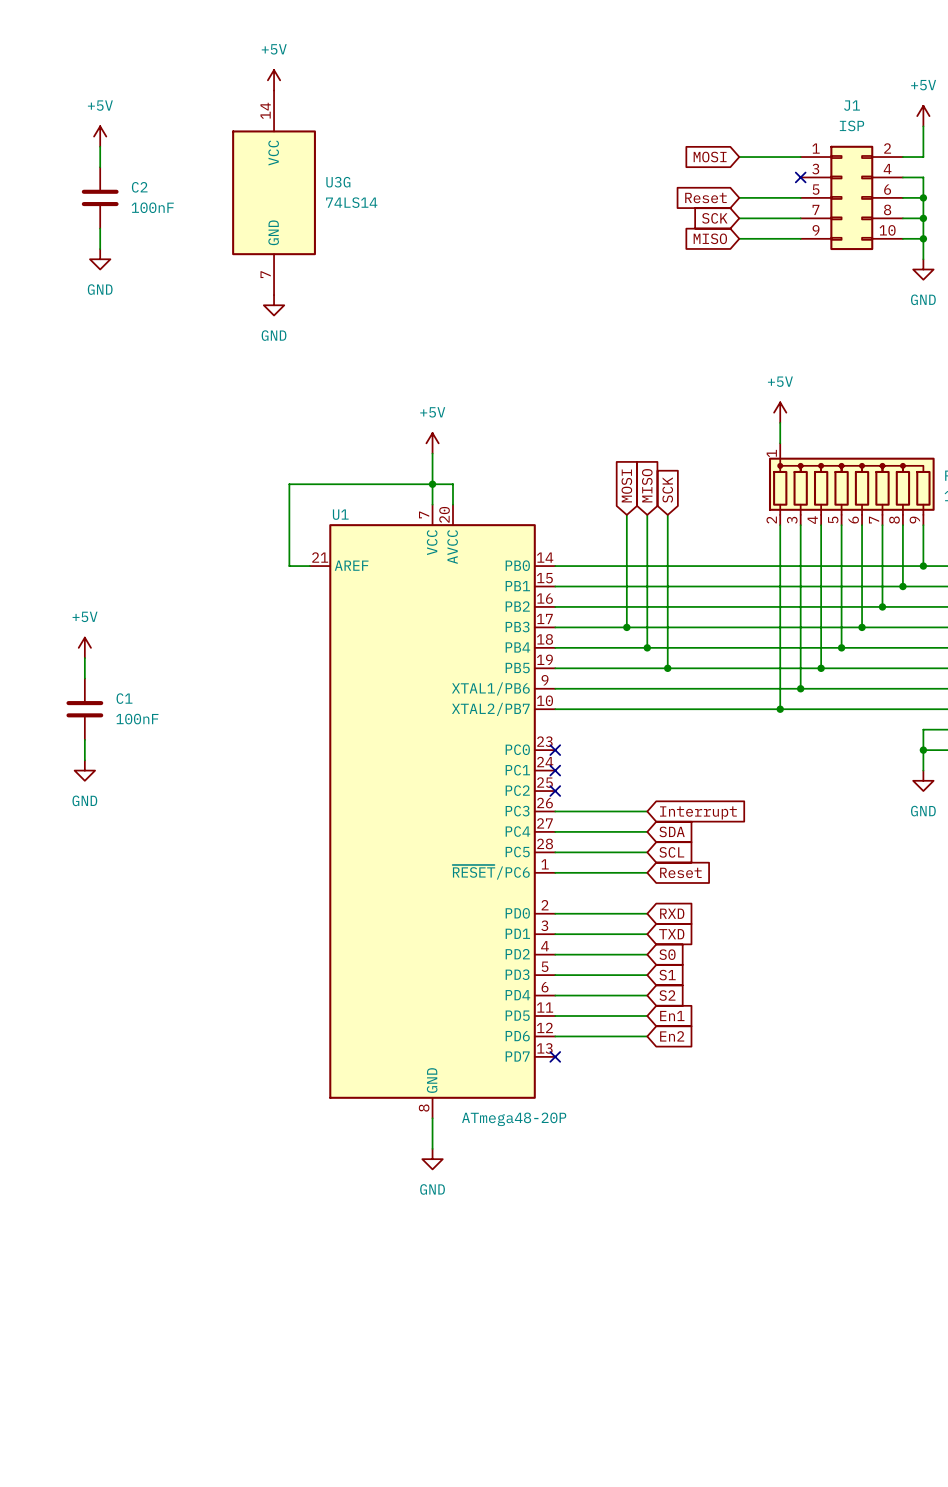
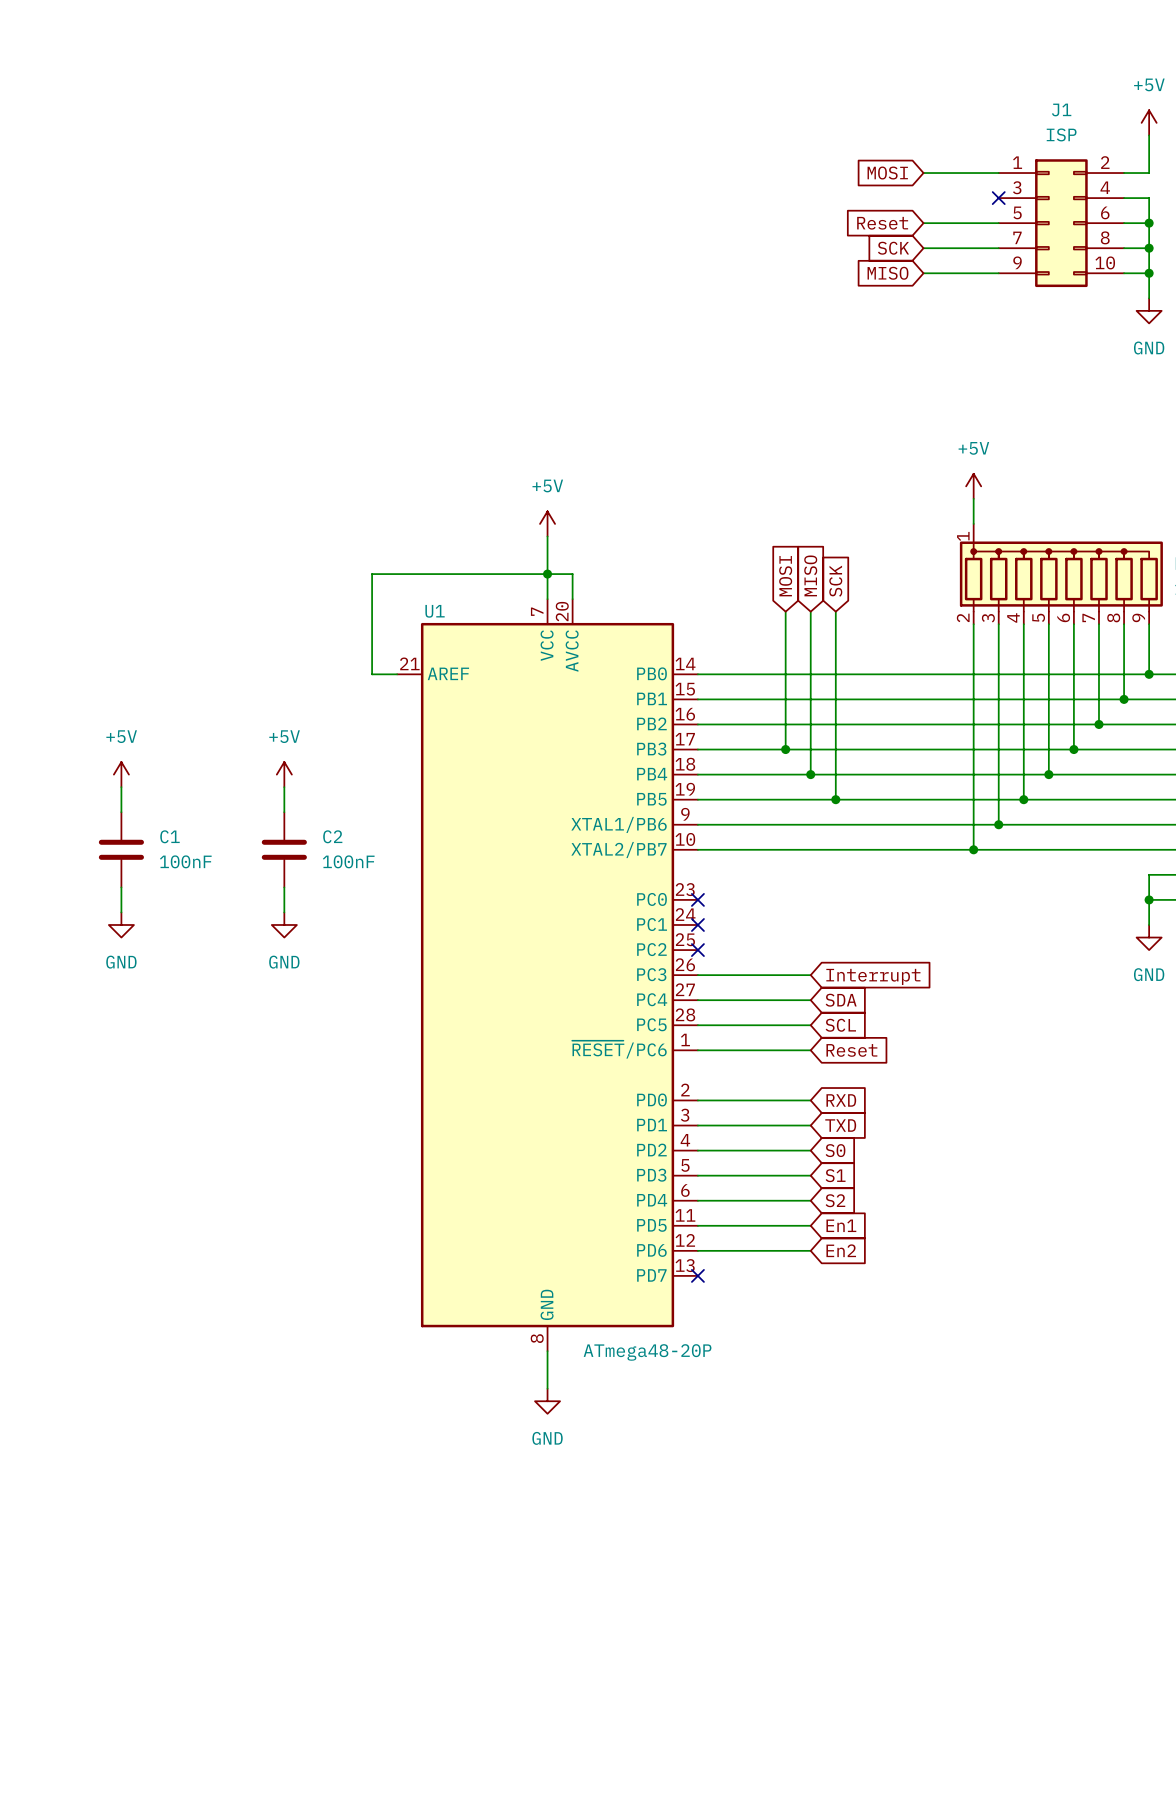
power symbol: +5V (274, 80) -> none
power symbol: +5V (100, 136) -> none
wire: (100, 146) (100, 167) -> none
U3G: 74LS14 (274, 192) -> none
C2 position: (100, 197) -> (284, 849)
wire: (100, 228) (100, 249) -> none
power symbol: GND (100, 259) -> none
power symbol: GND (274, 305) -> none
power symbol: none -> +5V (284, 774)
wire: none -> (284, 787) (284, 812)
wire: none -> (284, 887) (284, 912)
power symbol: none -> GND (284, 924)

